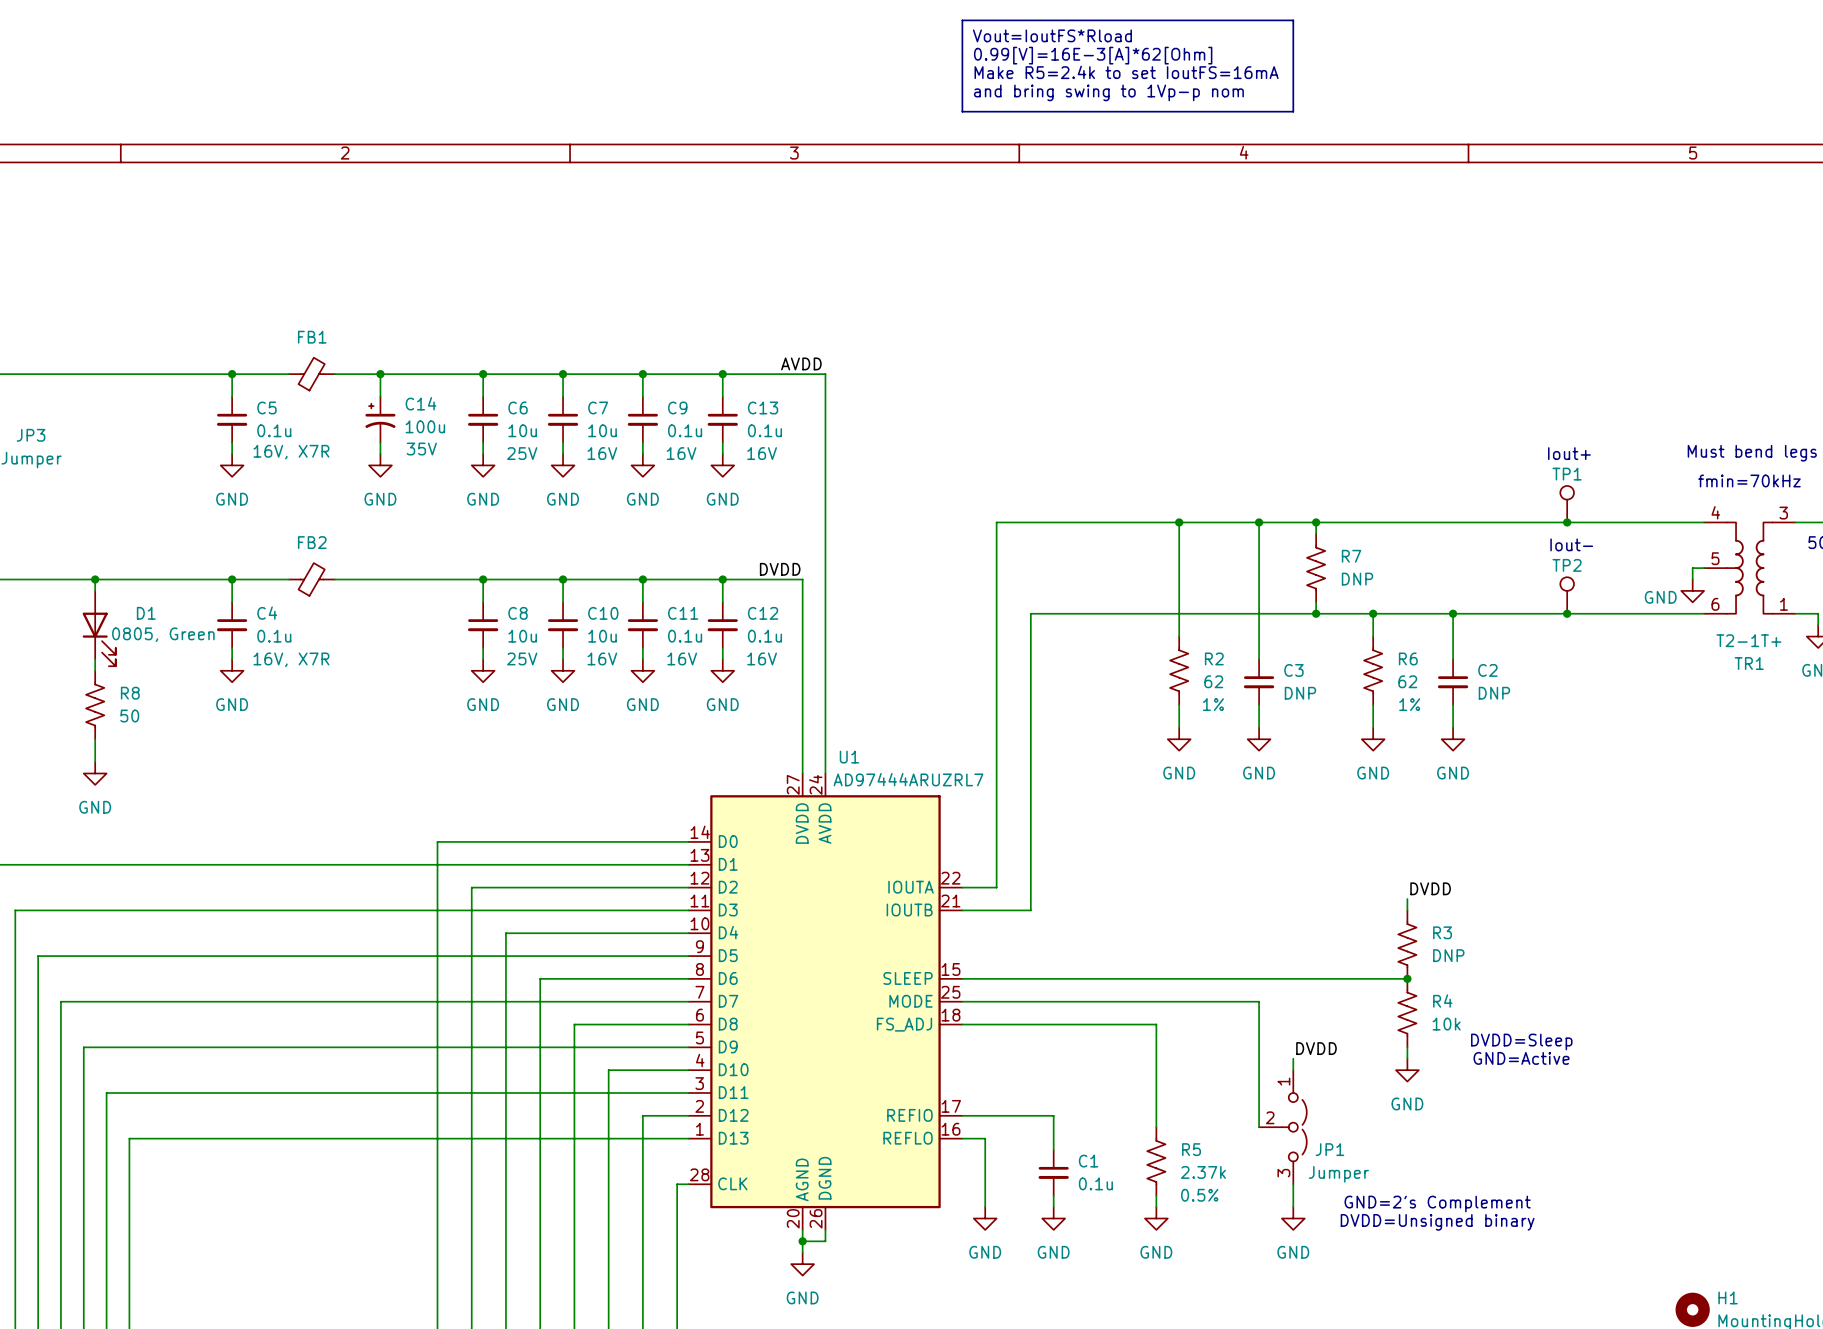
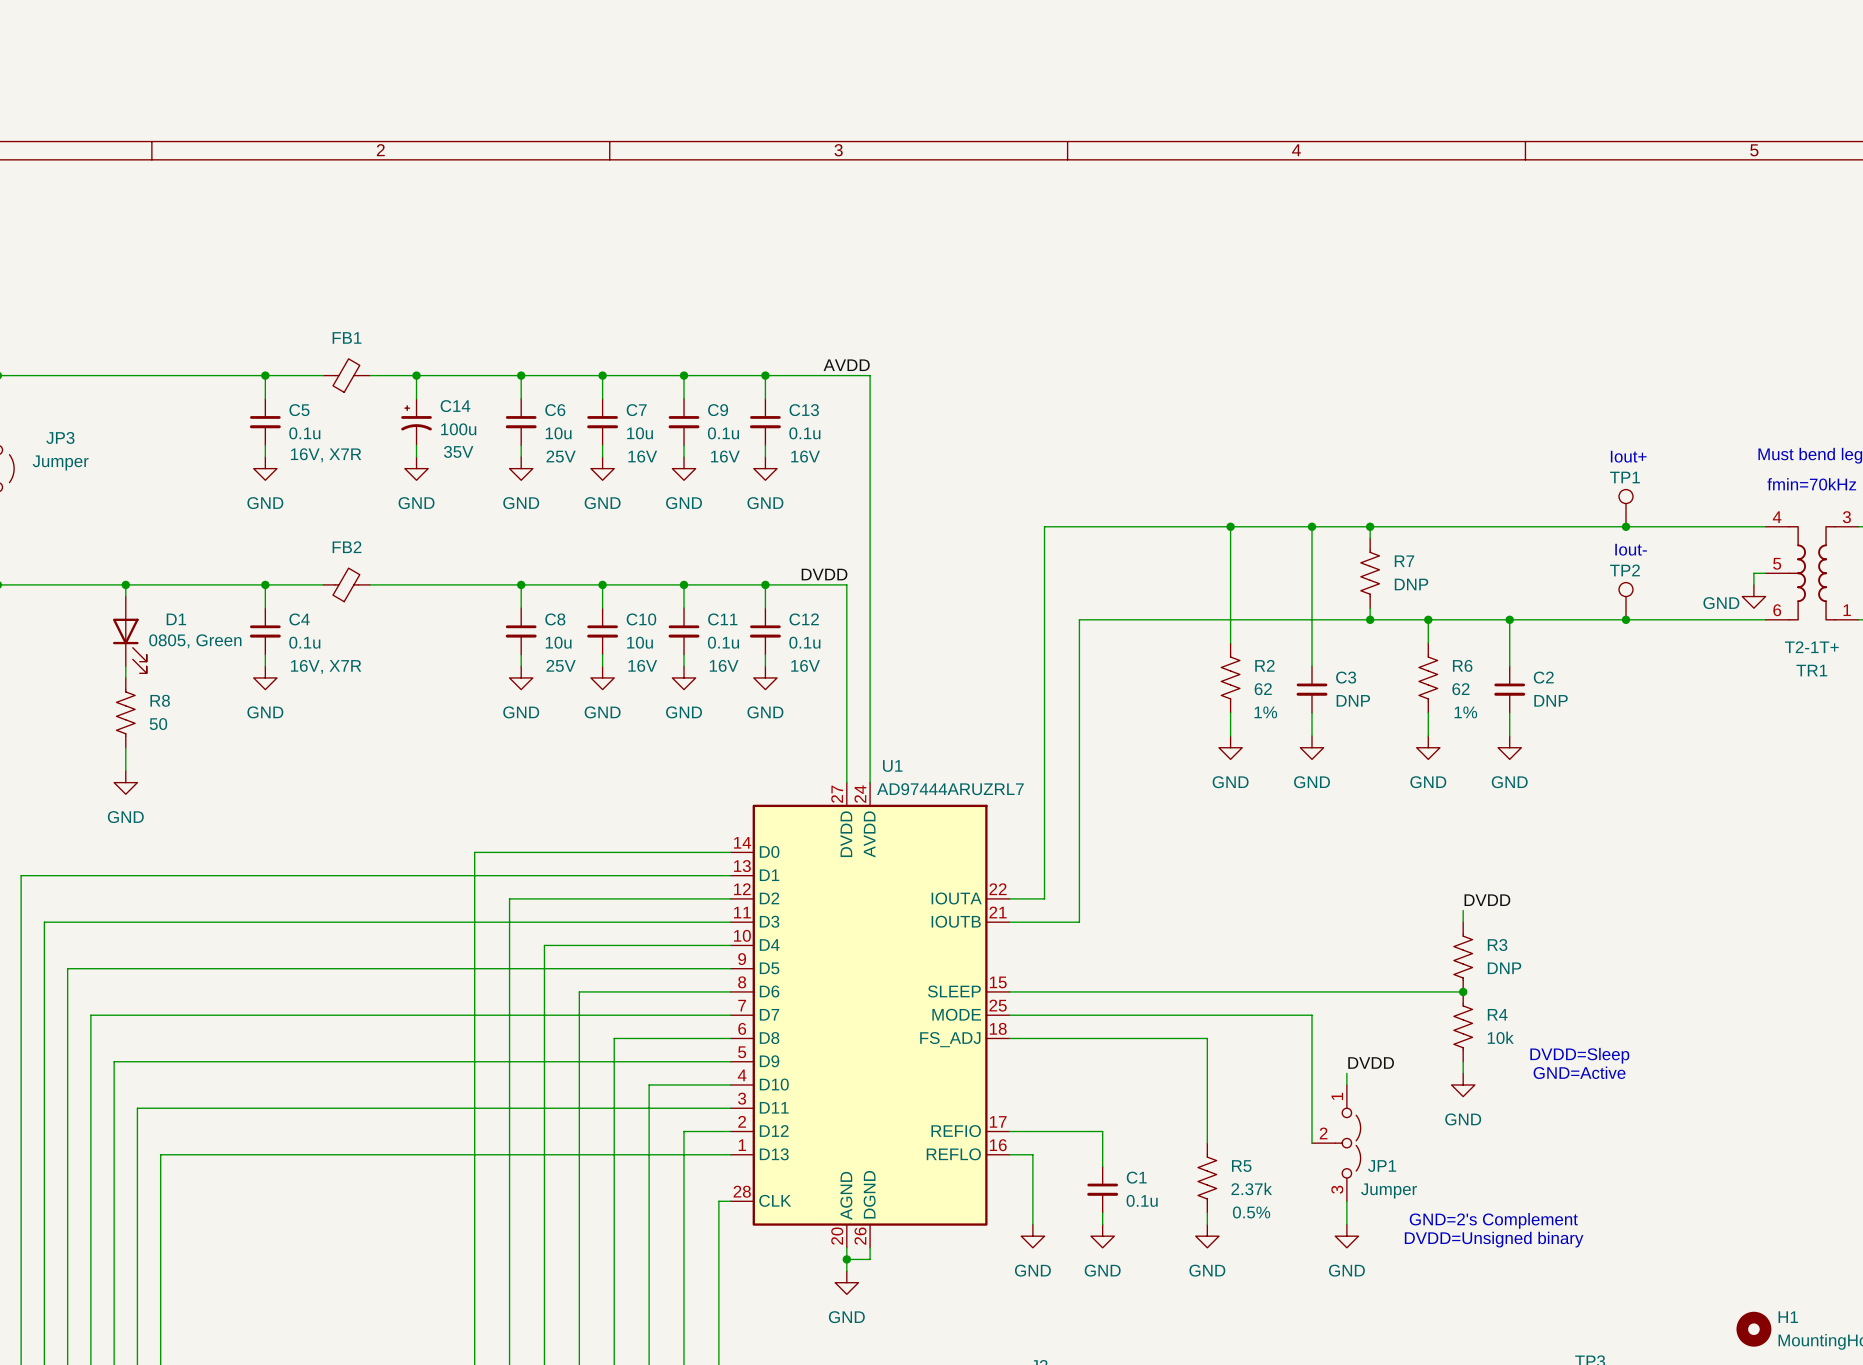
line: (962, 20) (1293, 20) (1293, 111) (962, 111) (962, 20) -> none
text: Vout=IoutFS*Rload (1052, 35) -> none
text: 0.99[V]=16E-3[A]*62[Ohm] (1093, 55) -> none
text: Make R5=2.4k to set IoutFS=16mA (1126, 72) -> none
text: and bring swing to 1Vp-p nom (1108, 92) -> none

